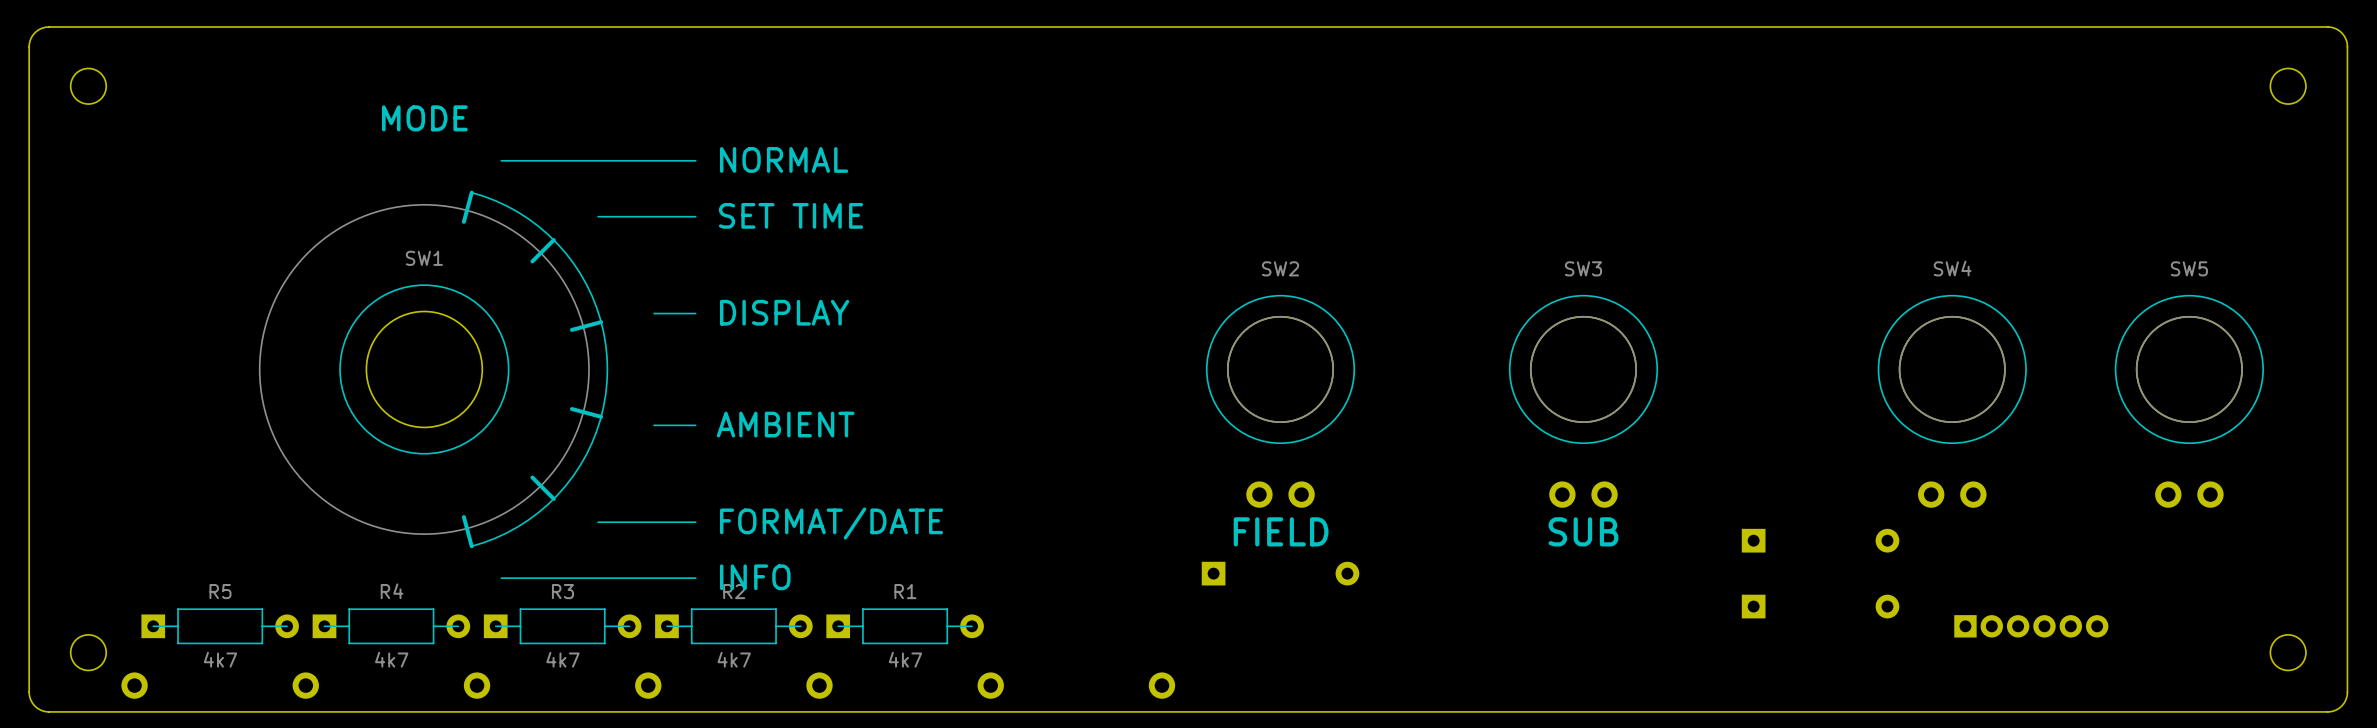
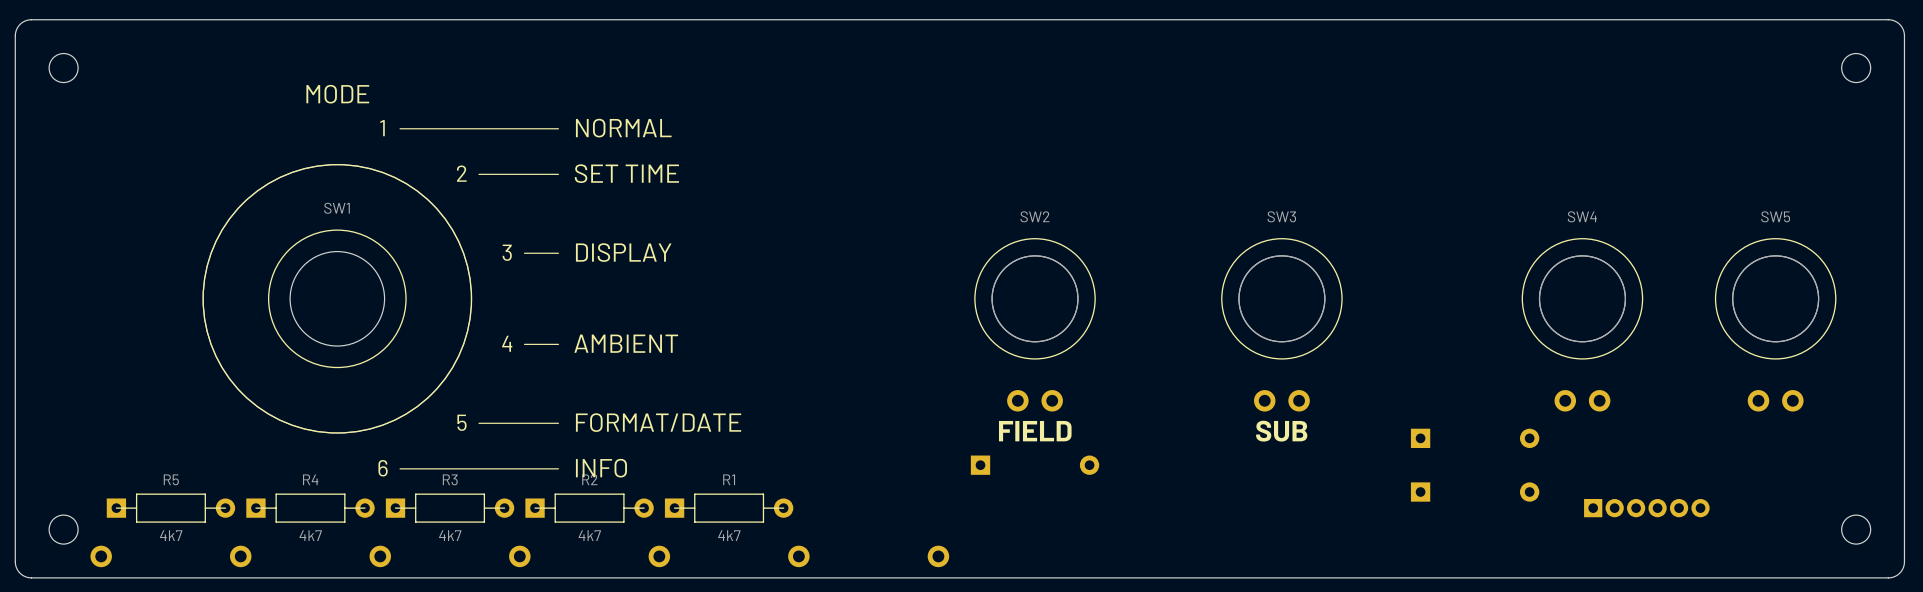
text: none -> 1 (382, 128)
drawing: none -> [202, 163, 473, 434]
text: none -> 2 (461, 173)
line: (463, 221) (471, 192) (495, 200) (518, 212) (538, 226) (557, 243) (580, 273) (596, 307) (603, 331) (607, 369) (603, 407) (596, 431) (580, 465) (557, 495) (538, 512) (518, 526) (495, 538) (471, 546) (463, 517) -> none
line: (553, 239) (532, 261) -> none
text: none -> 3 (507, 252)
line: (601, 322) (571, 329) -> none
line: (571, 409) (601, 416) -> none
text: none -> 4 (507, 343)
line: (532, 477) (553, 498) -> none
text: none -> 5 (461, 422)
text: none -> 6 (383, 468)

